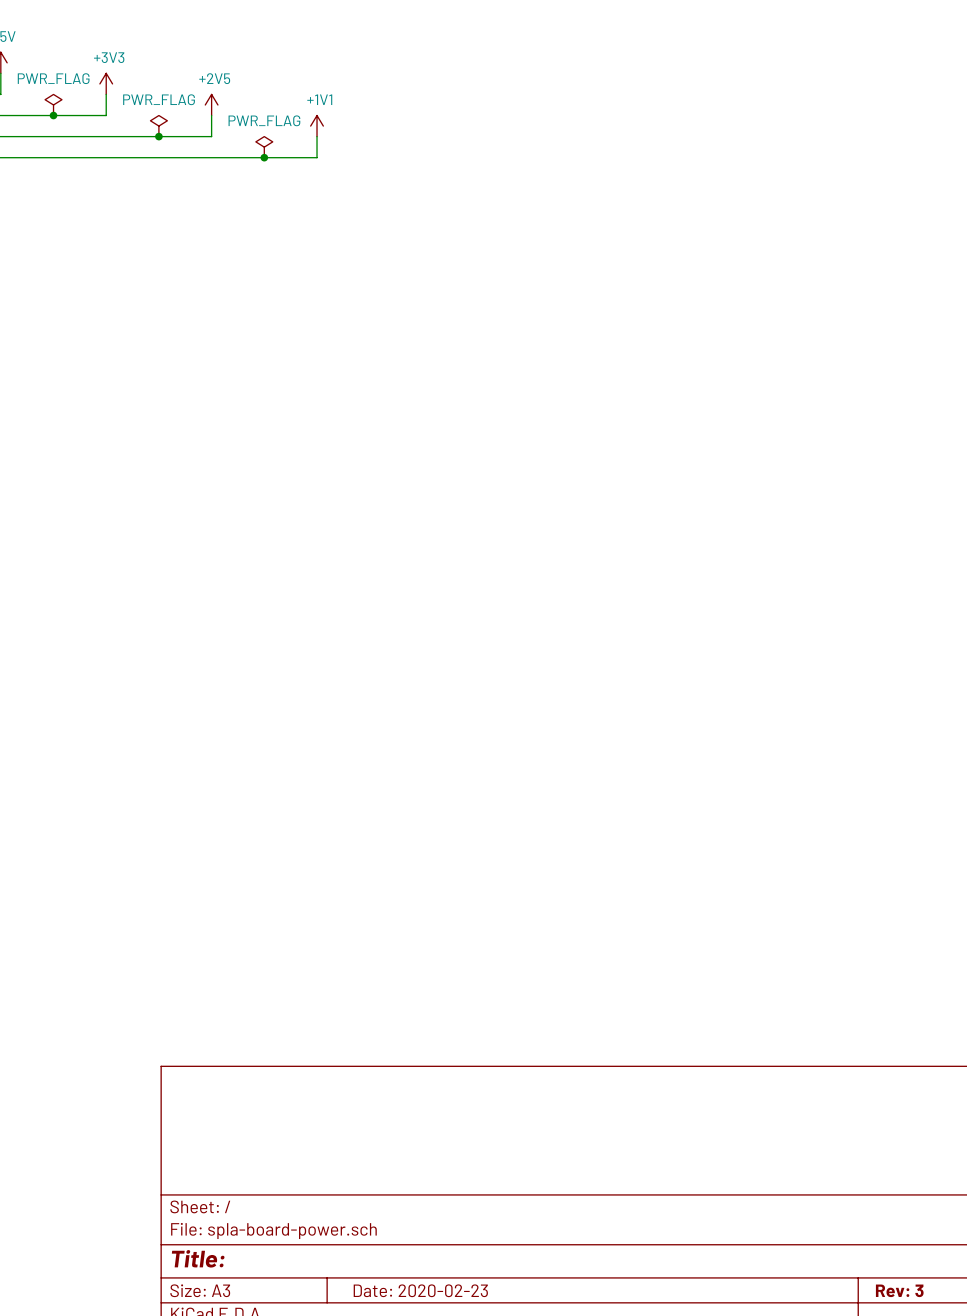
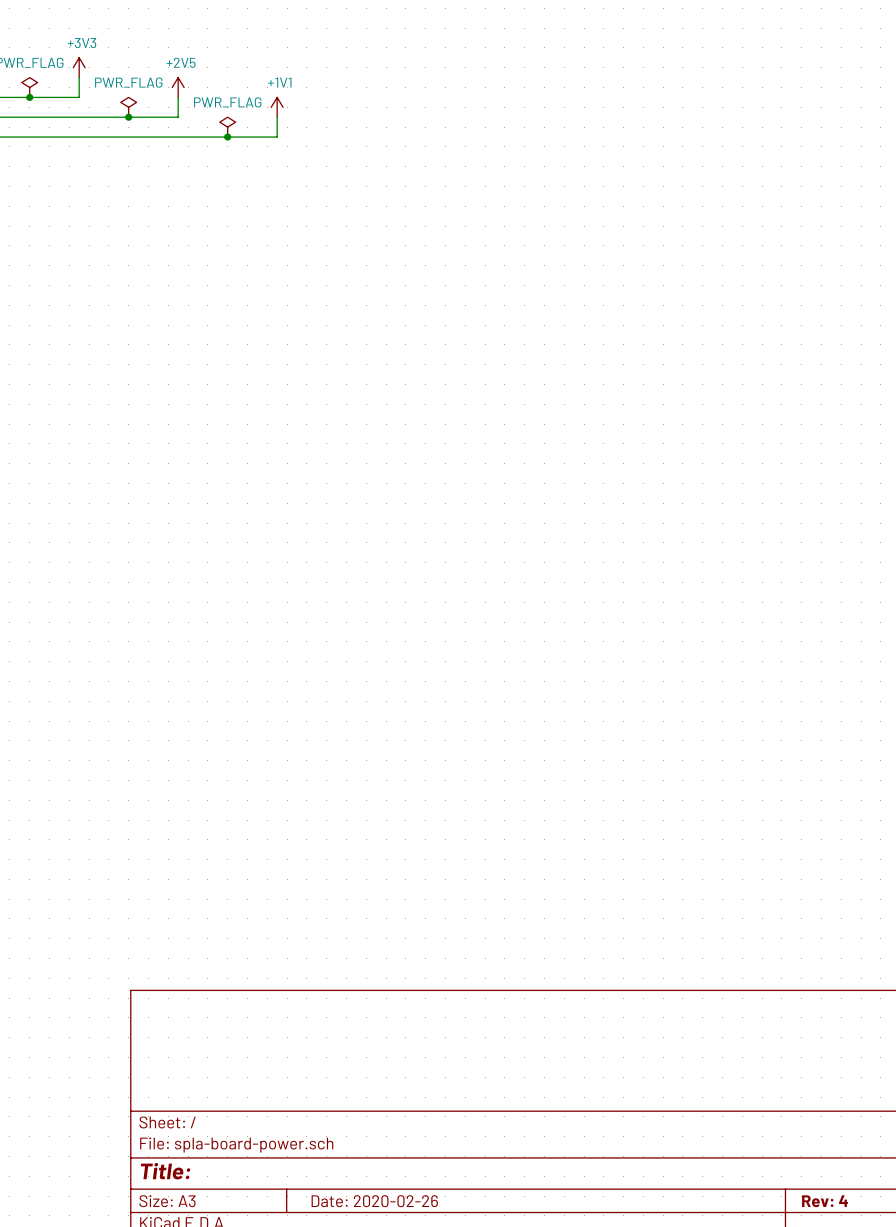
title block: Date: 2020-02-23 (420, 1290) -> Date: 2020-02-26 (374, 1201)
title block: Rev: 3 (899, 1290) -> Rev: 4 (824, 1201)

